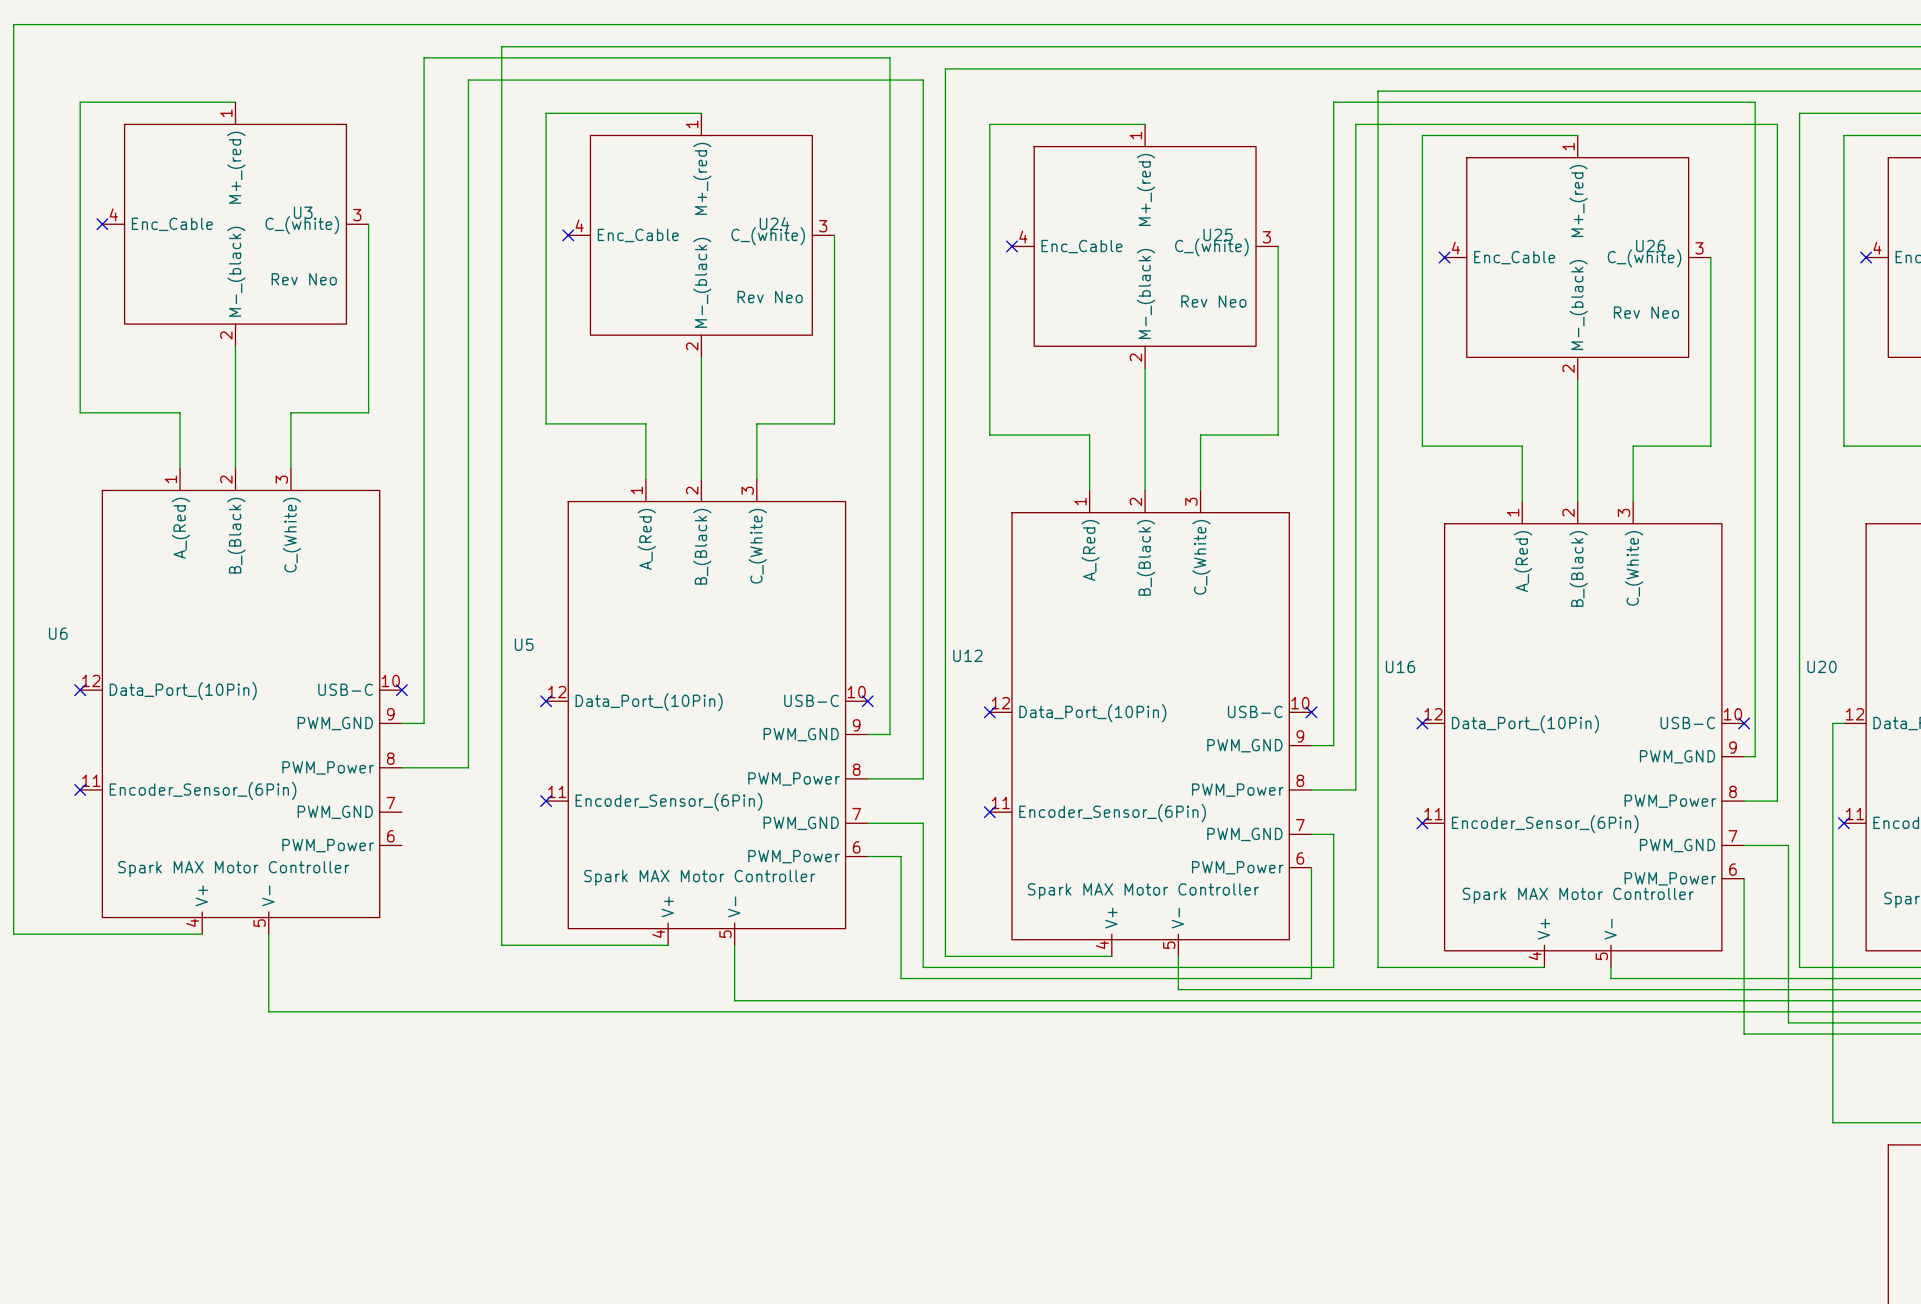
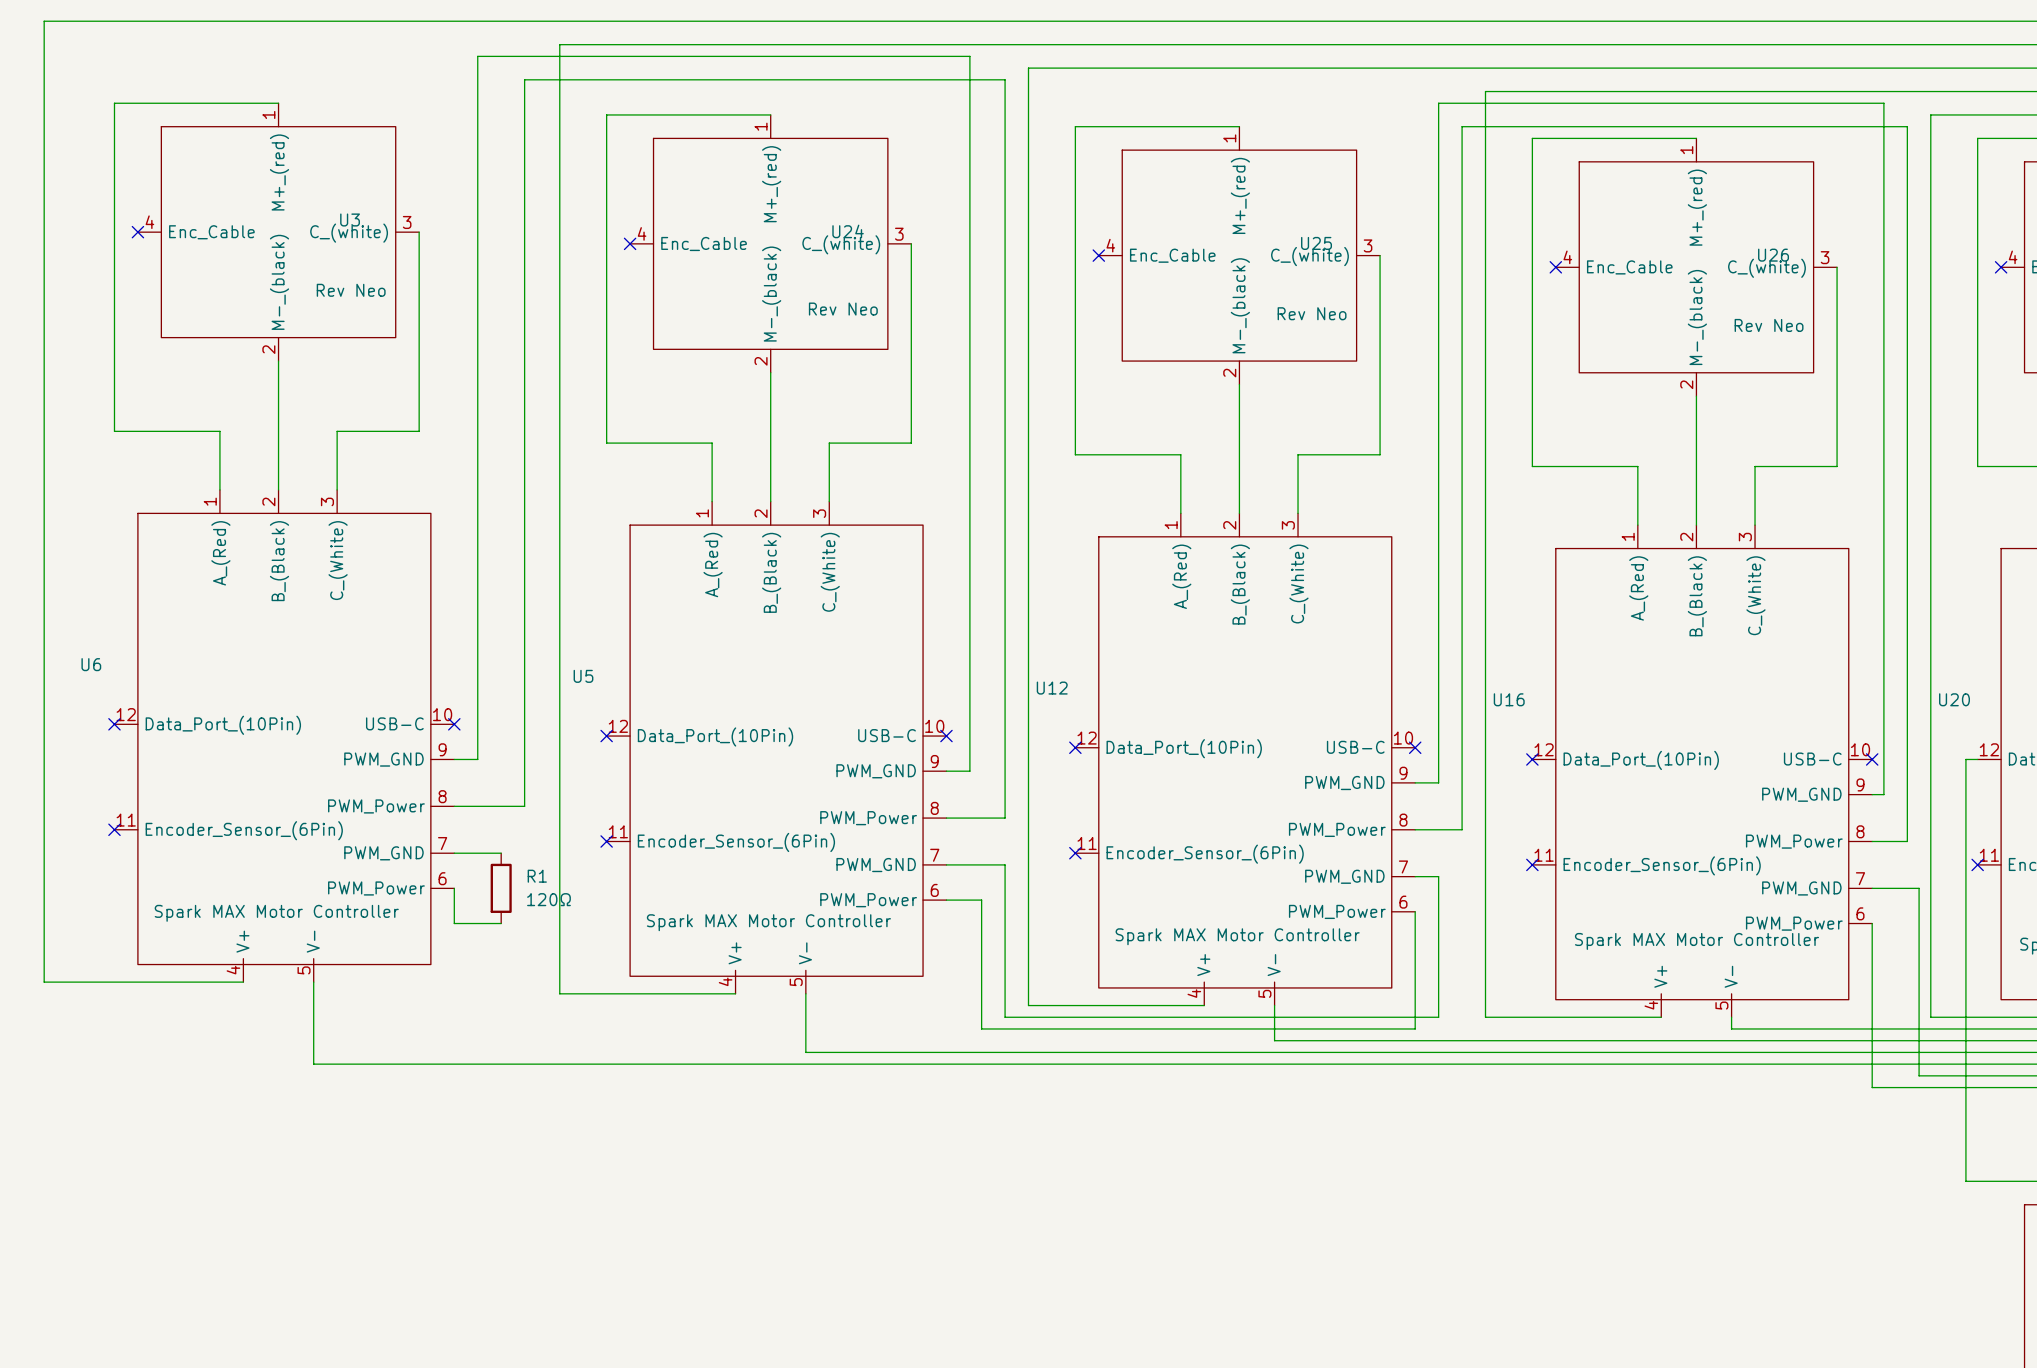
wire: none -> (454, 853) (501, 853)
wire: none -> (454, 888) (454, 923) (501, 923)
R1: none -> 120Ω (501, 888)

